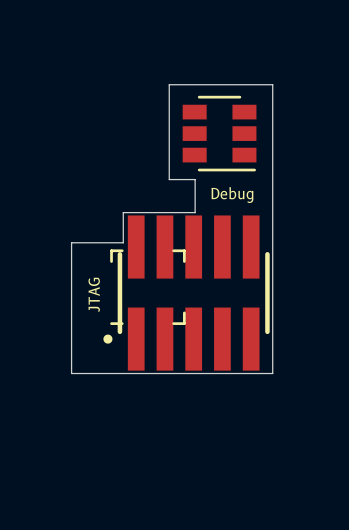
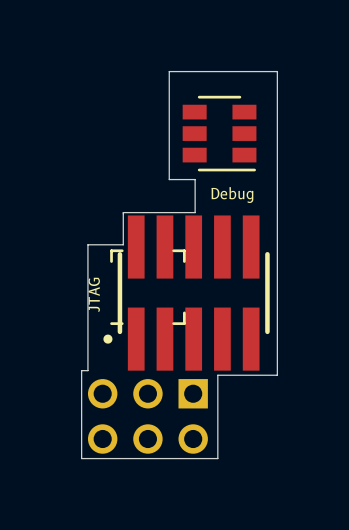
board edge: (169, 84) (272, 84) (272, 373) (71, 373) (71, 242) (123, 242) -> (169, 84) (169, 71) (277, 71) (277, 375) (217, 375) (217, 458) (81, 458) (81, 370) (87, 370) (87, 244) (123, 244) (123, 242)
part: none -> (147, 416)

